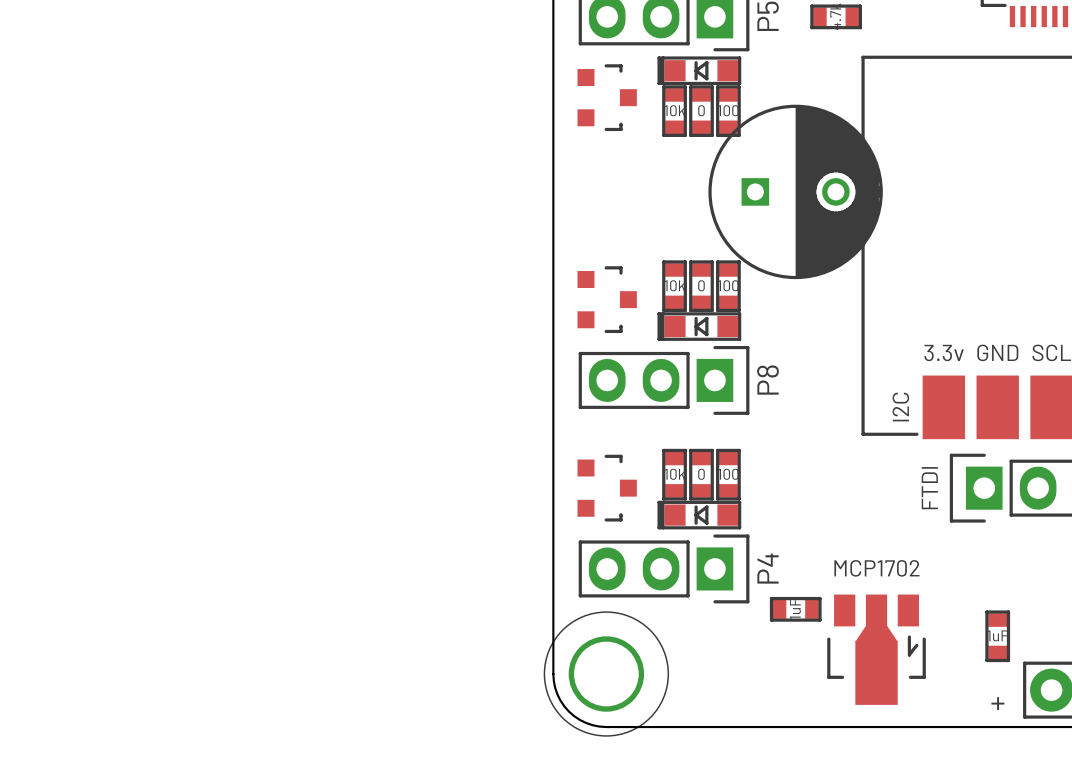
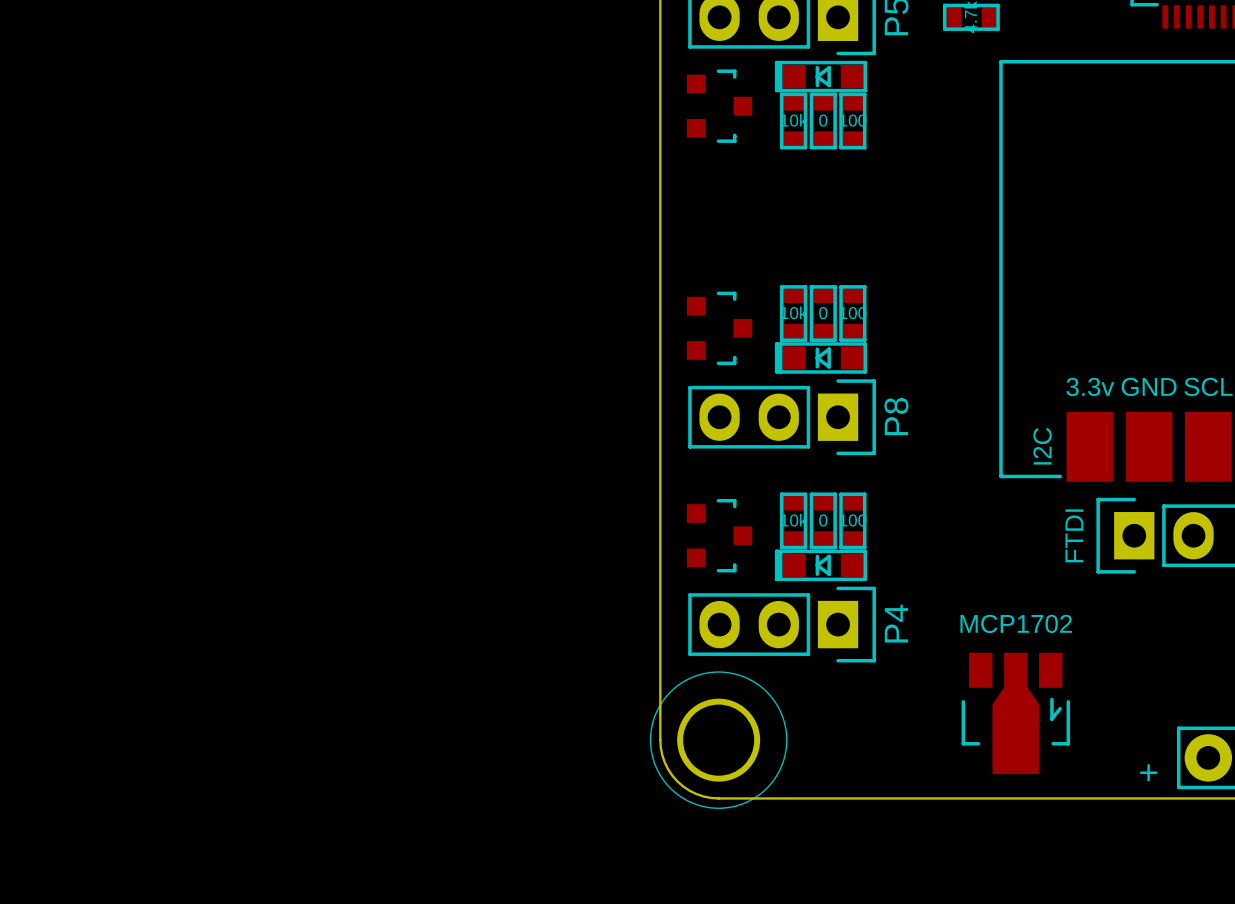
part: (795, 191) -> none
part: 1uF (795, 609) -> none
part: 1uF (997, 636) -> none

